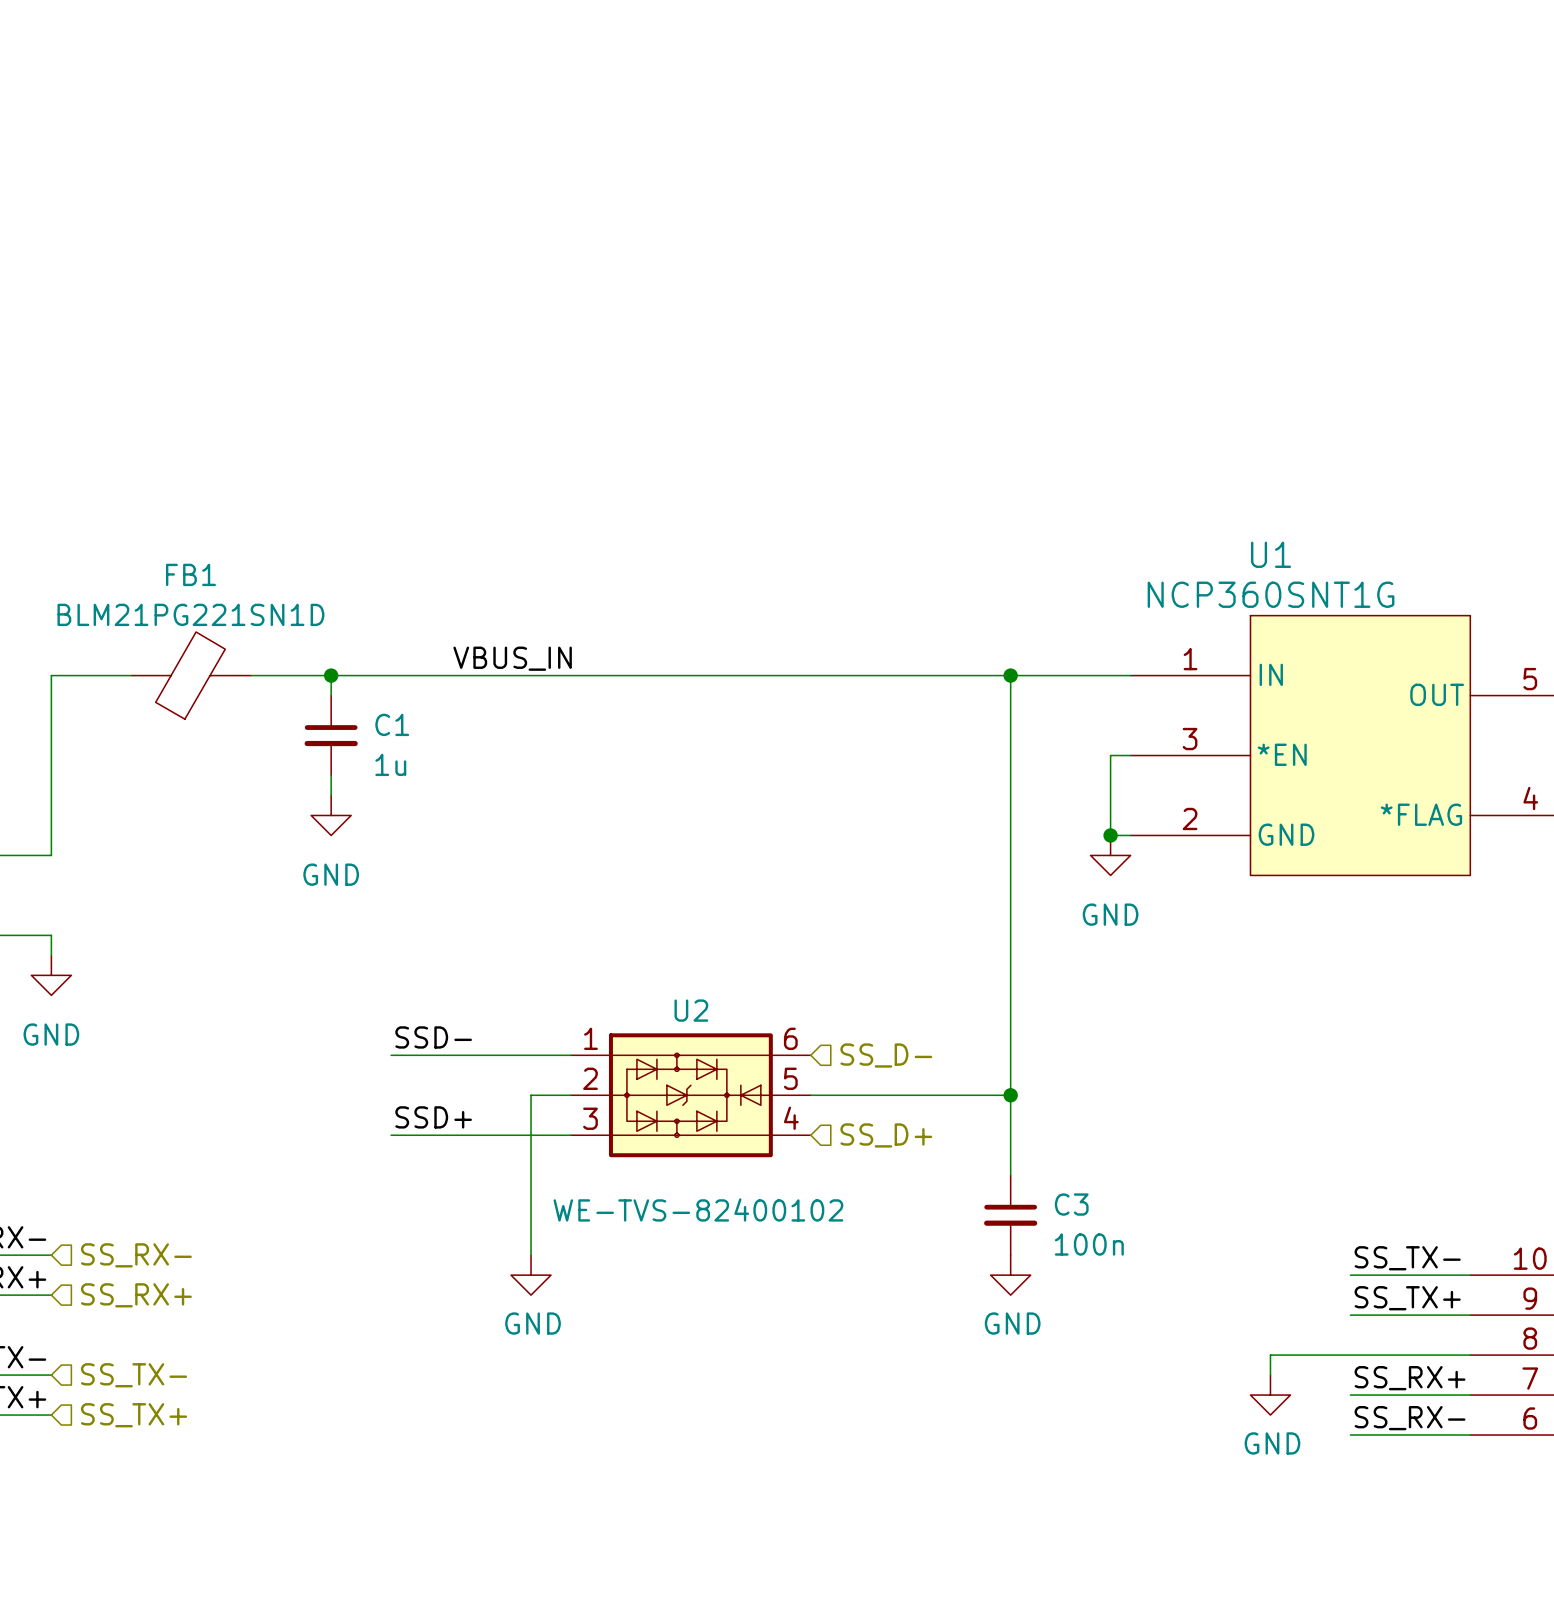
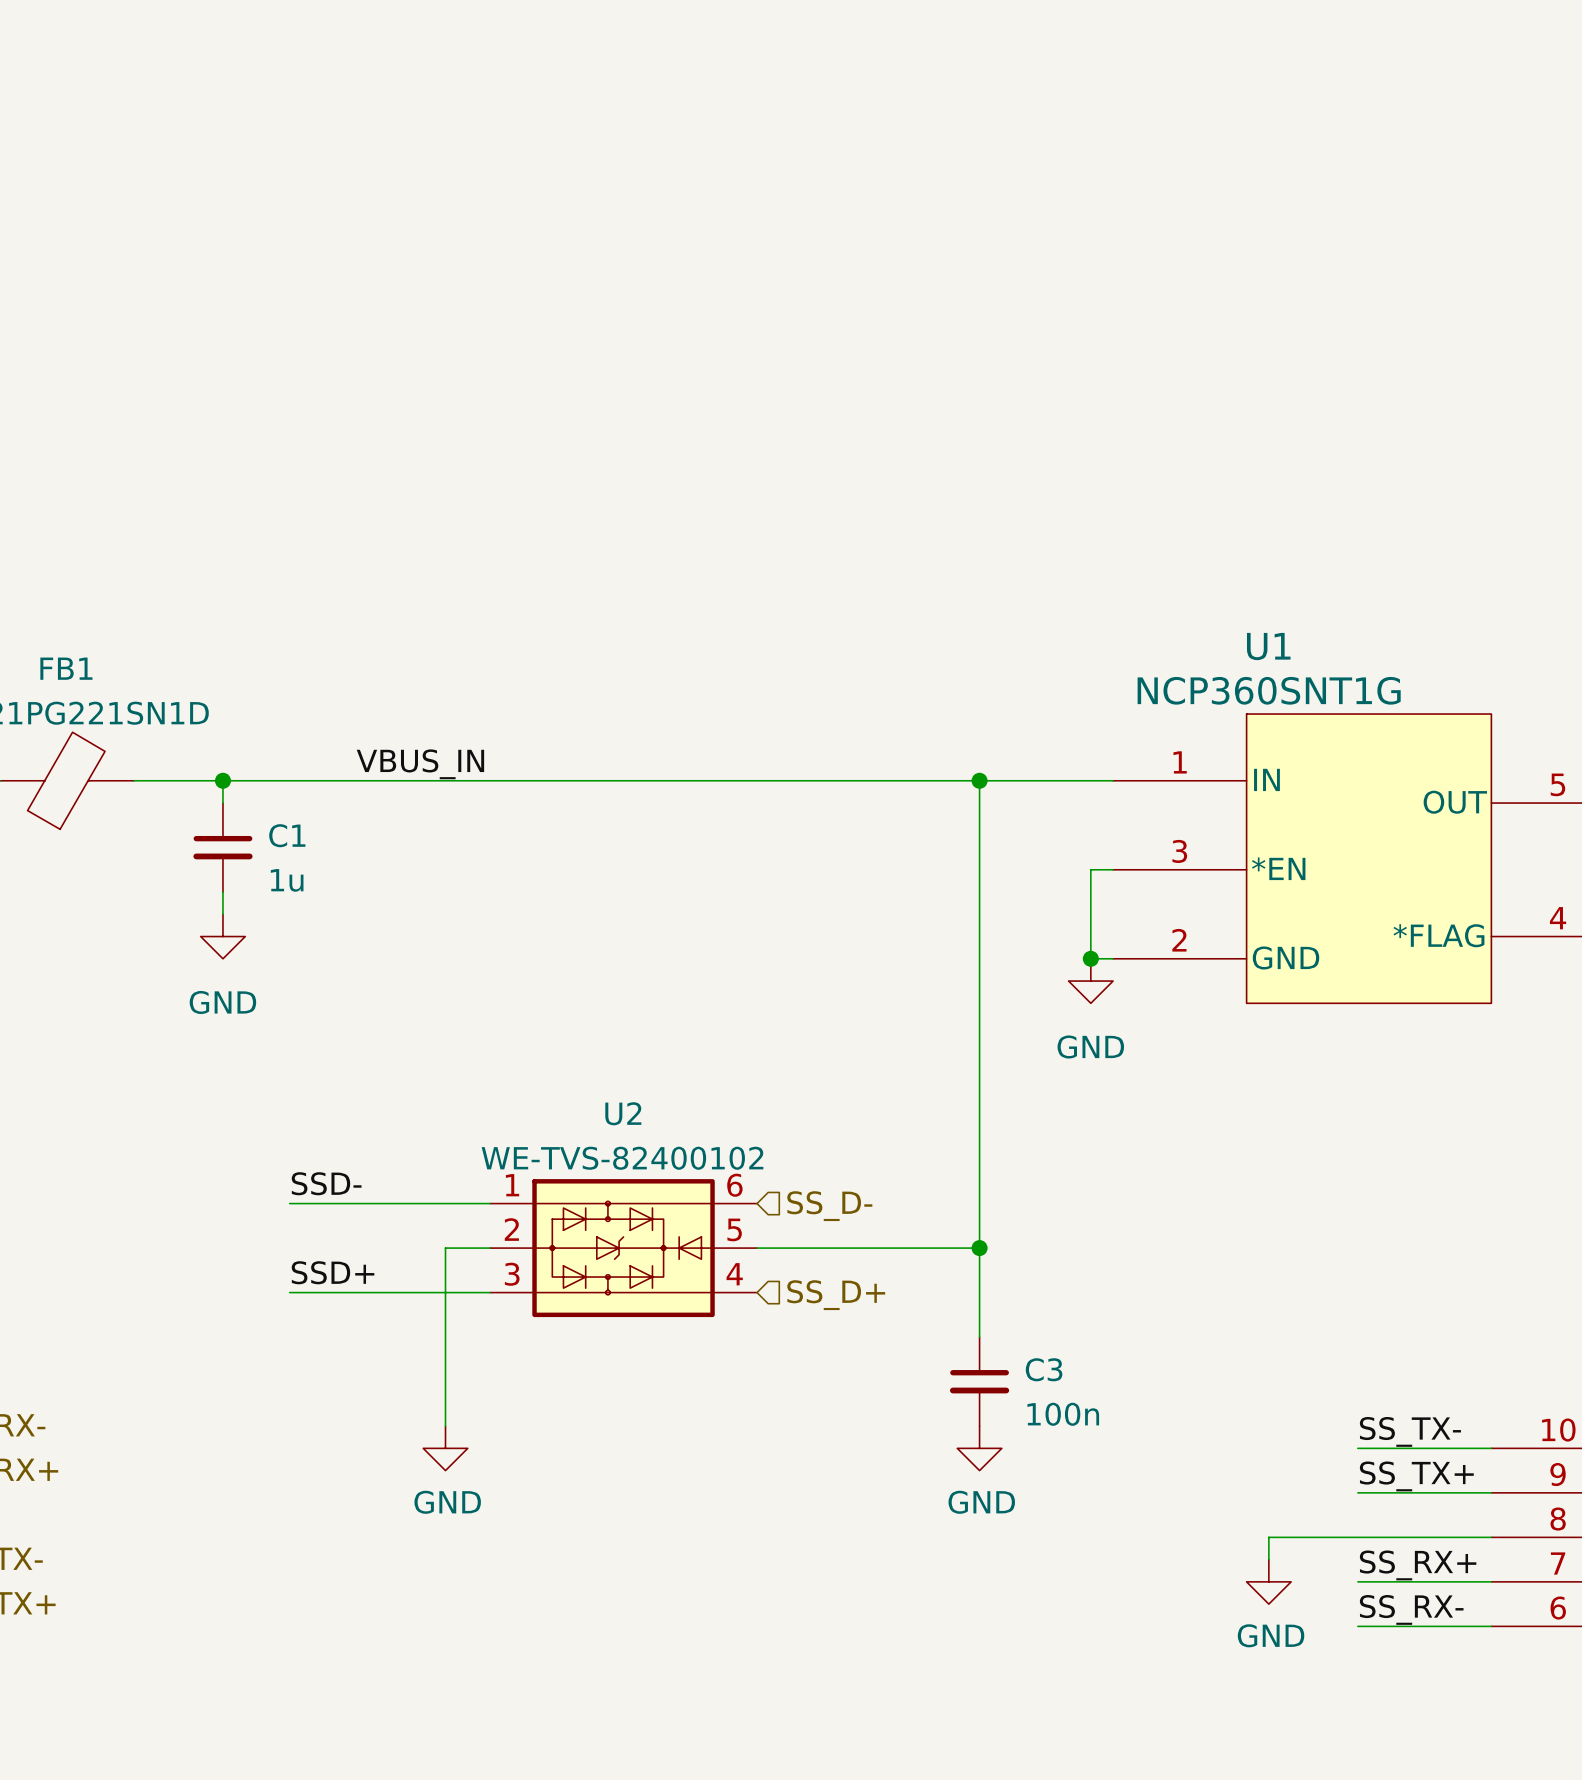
U2 name position: U2 (691, 1010) -> U2 (623, 1113)
U2 value position: WE-TVS-82400102 (698, 1209) -> WE-TVS-82400102 (622, 1158)

